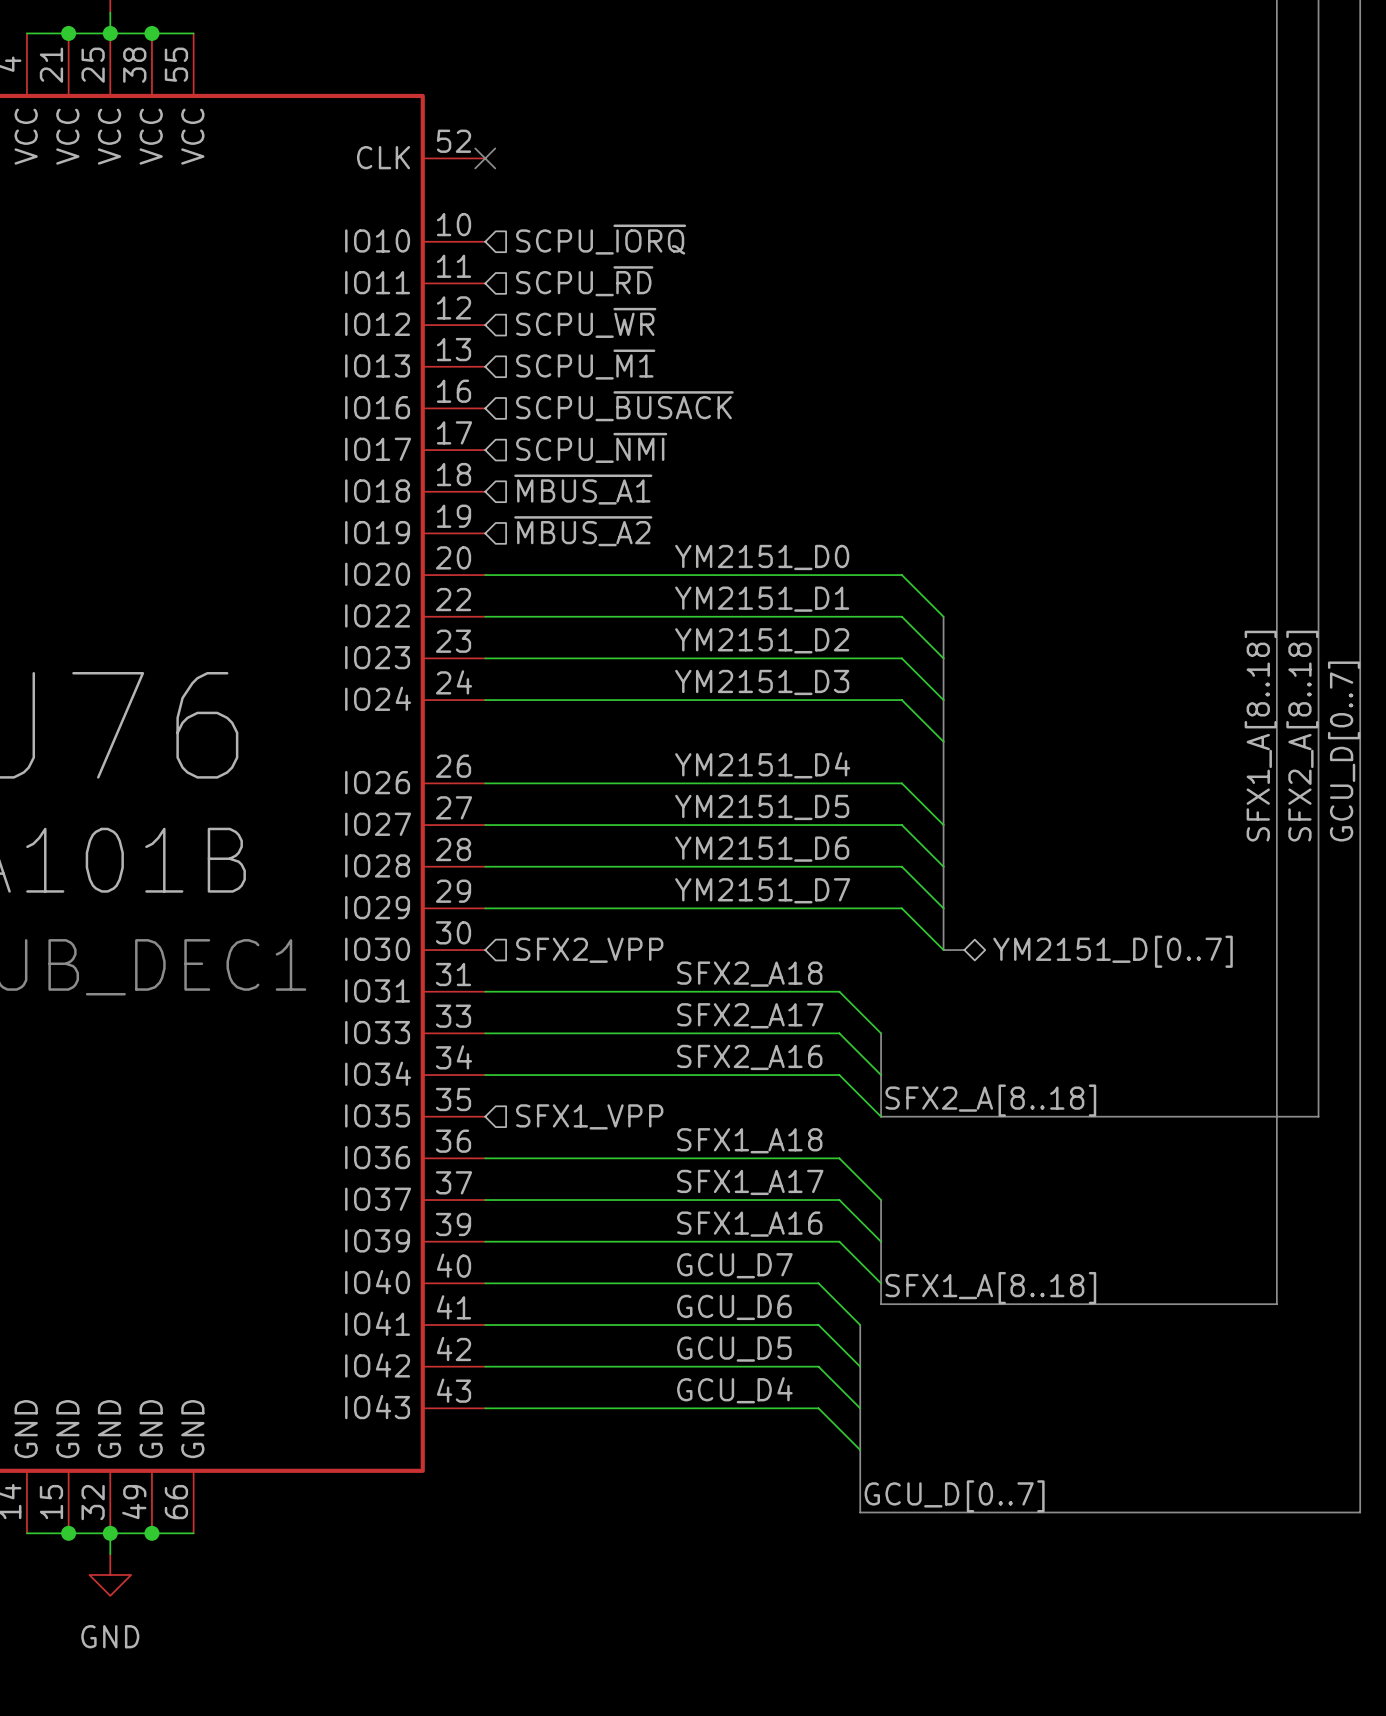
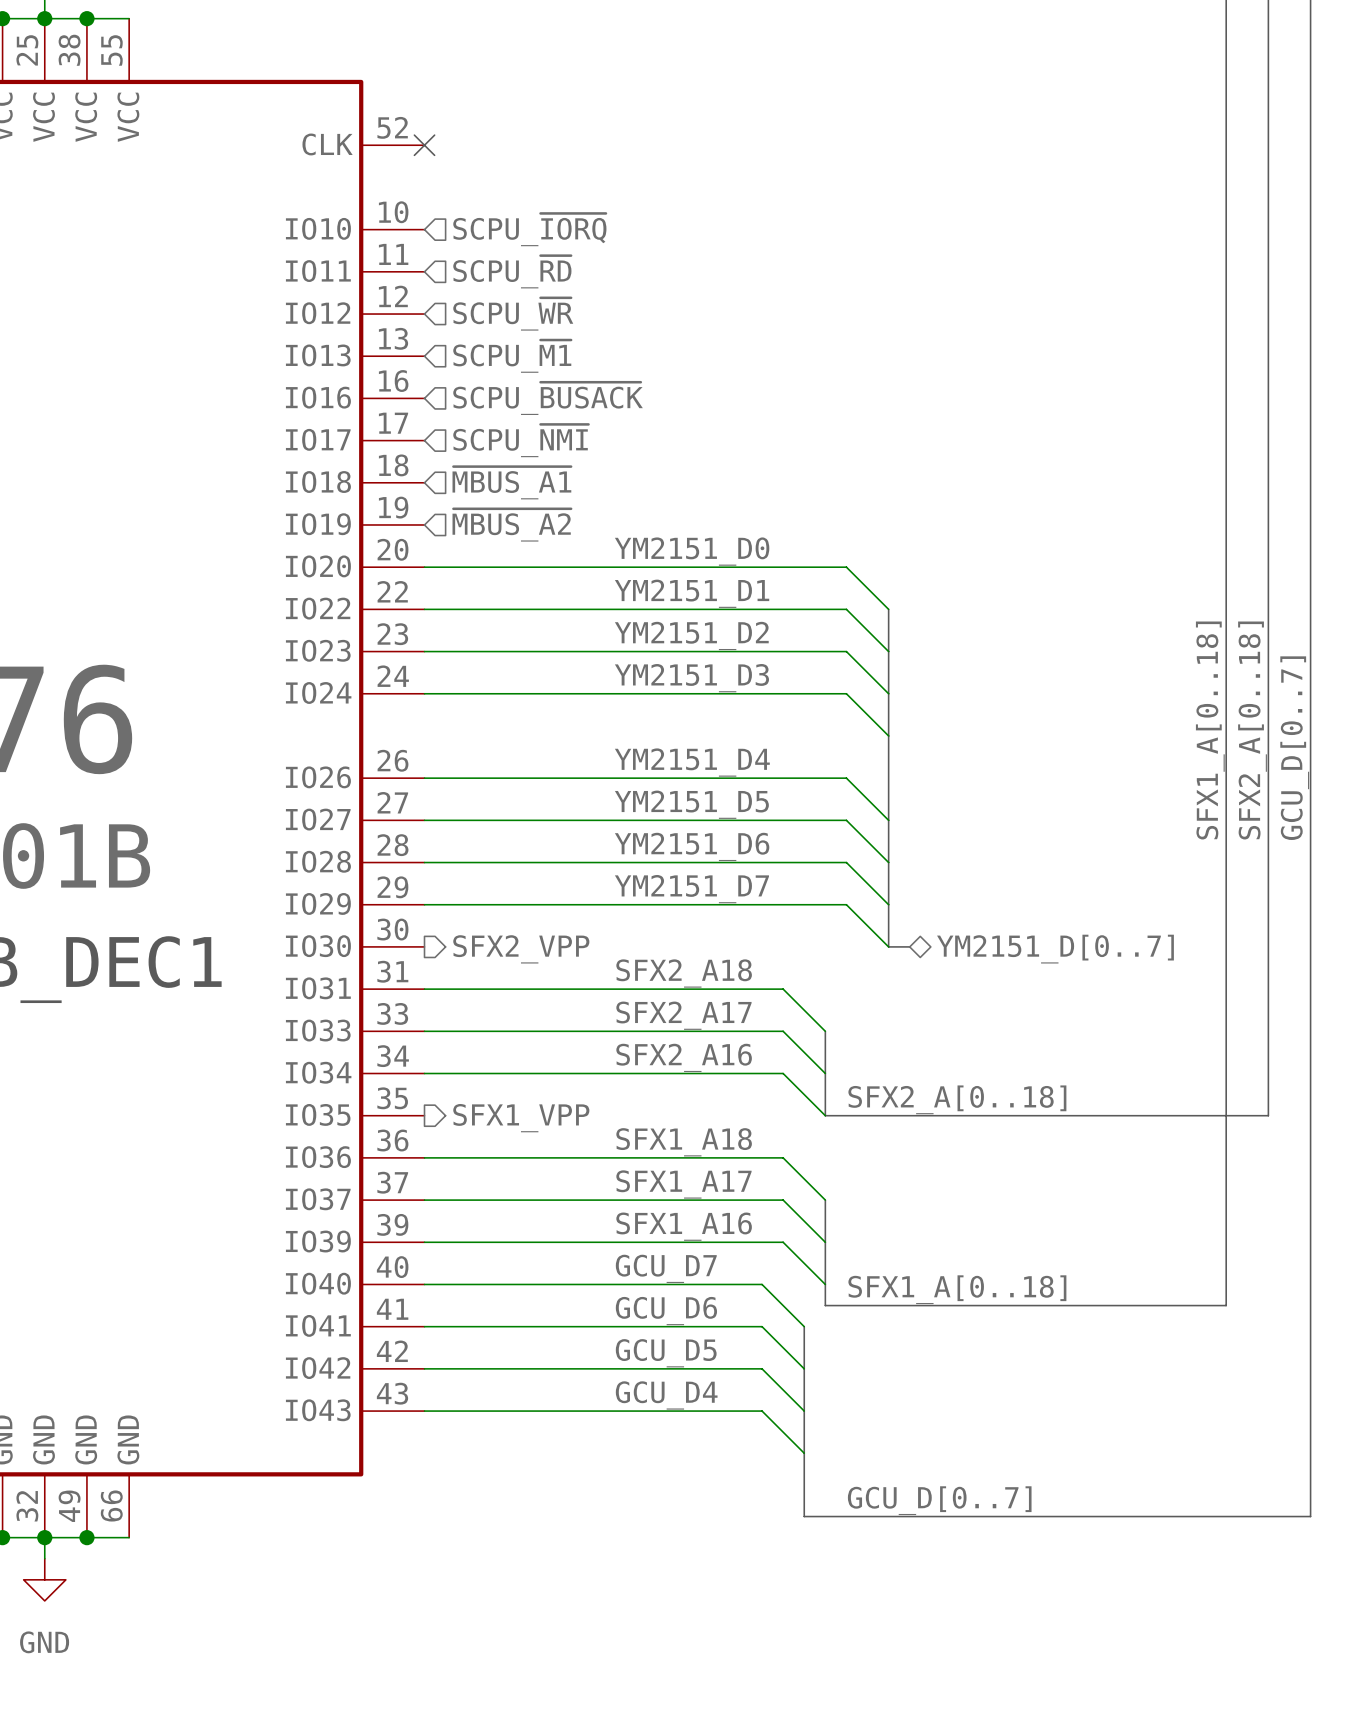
label: SFX1_A[8..18] (1260, 736) -> SFX1_A[0..18] (1210, 730)
label: SFX2_A[8..18] (1302, 736) -> SFX2_A[0..18] (1252, 730)
hierarchical label shape: input (589, 950) -> output (521, 949)
label: SFX2_A[8..18] (990, 1100) -> SFX2_A[0..18] (957, 1099)
hierarchical label shape: input (589, 1116) -> output (521, 1118)
label: SFX1_A[8..18] (990, 1288) -> SFX1_A[0..18] (957, 1289)
label position: GCU_D[0..7] (954, 1496) -> GCU_D[0..7] (939, 1500)

